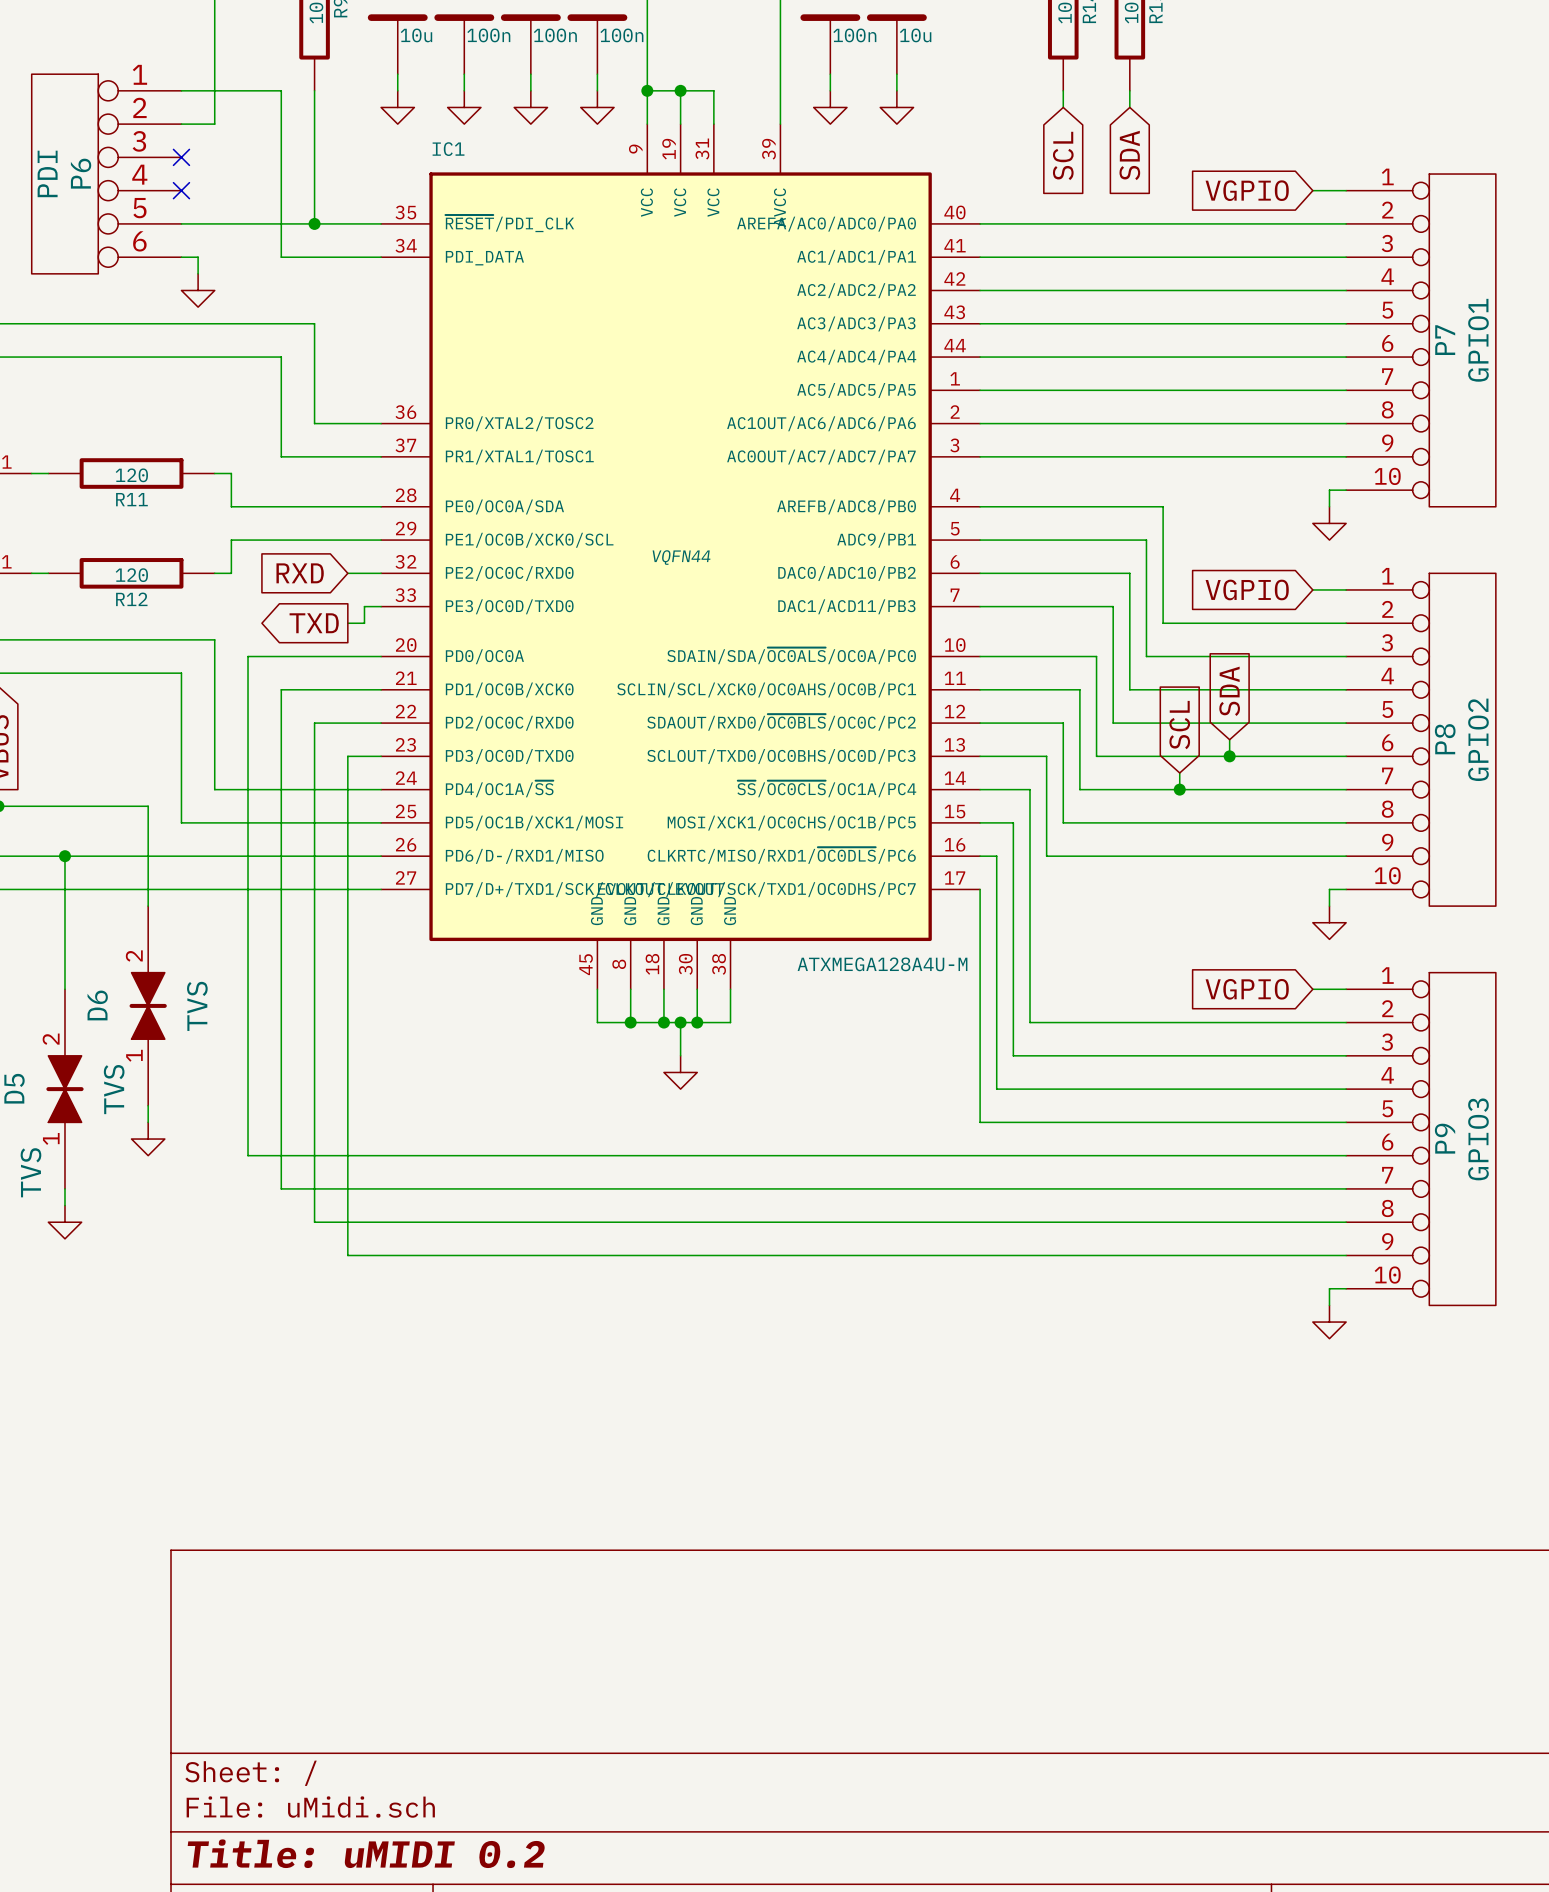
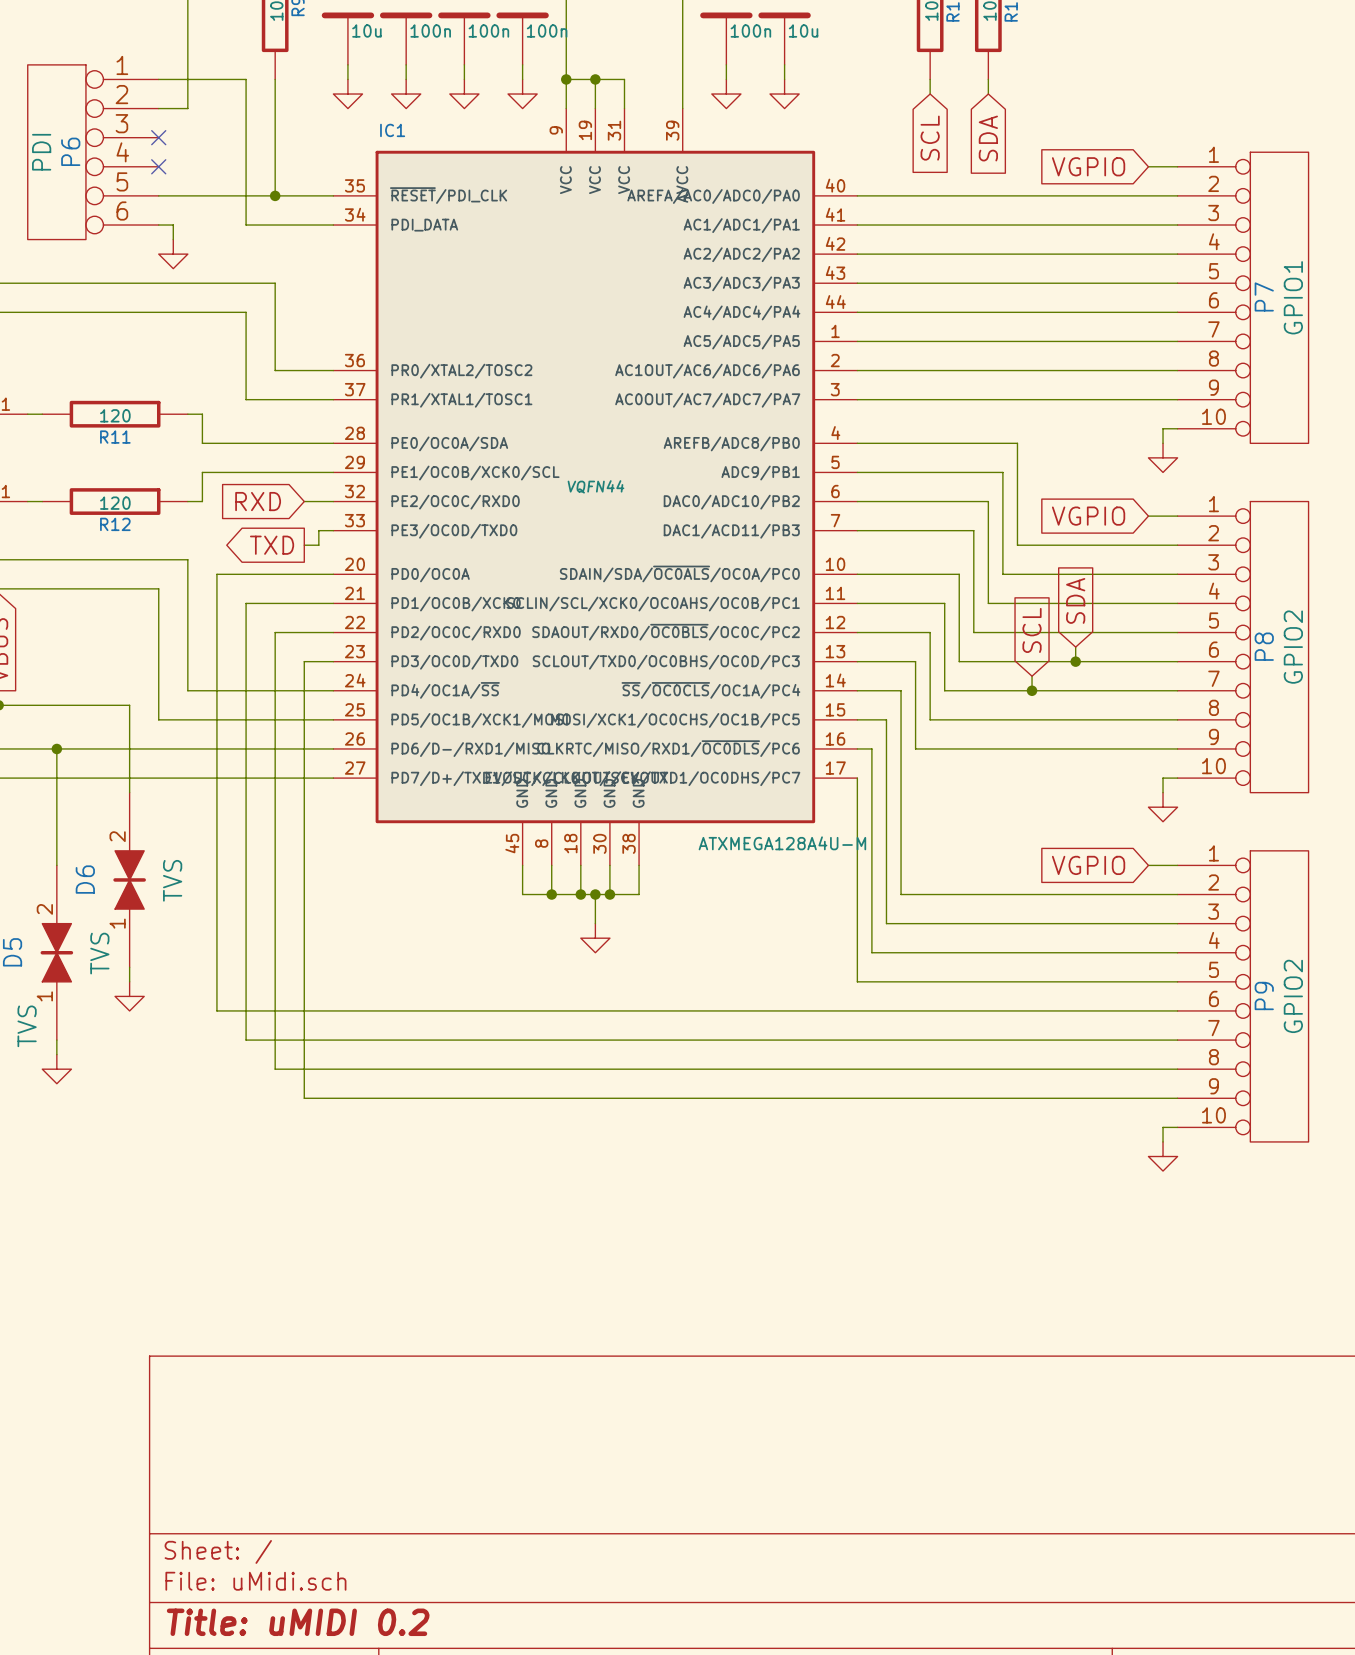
P9 value: GPIO3 (1478, 1139) -> GPIO2 (1293, 996)

